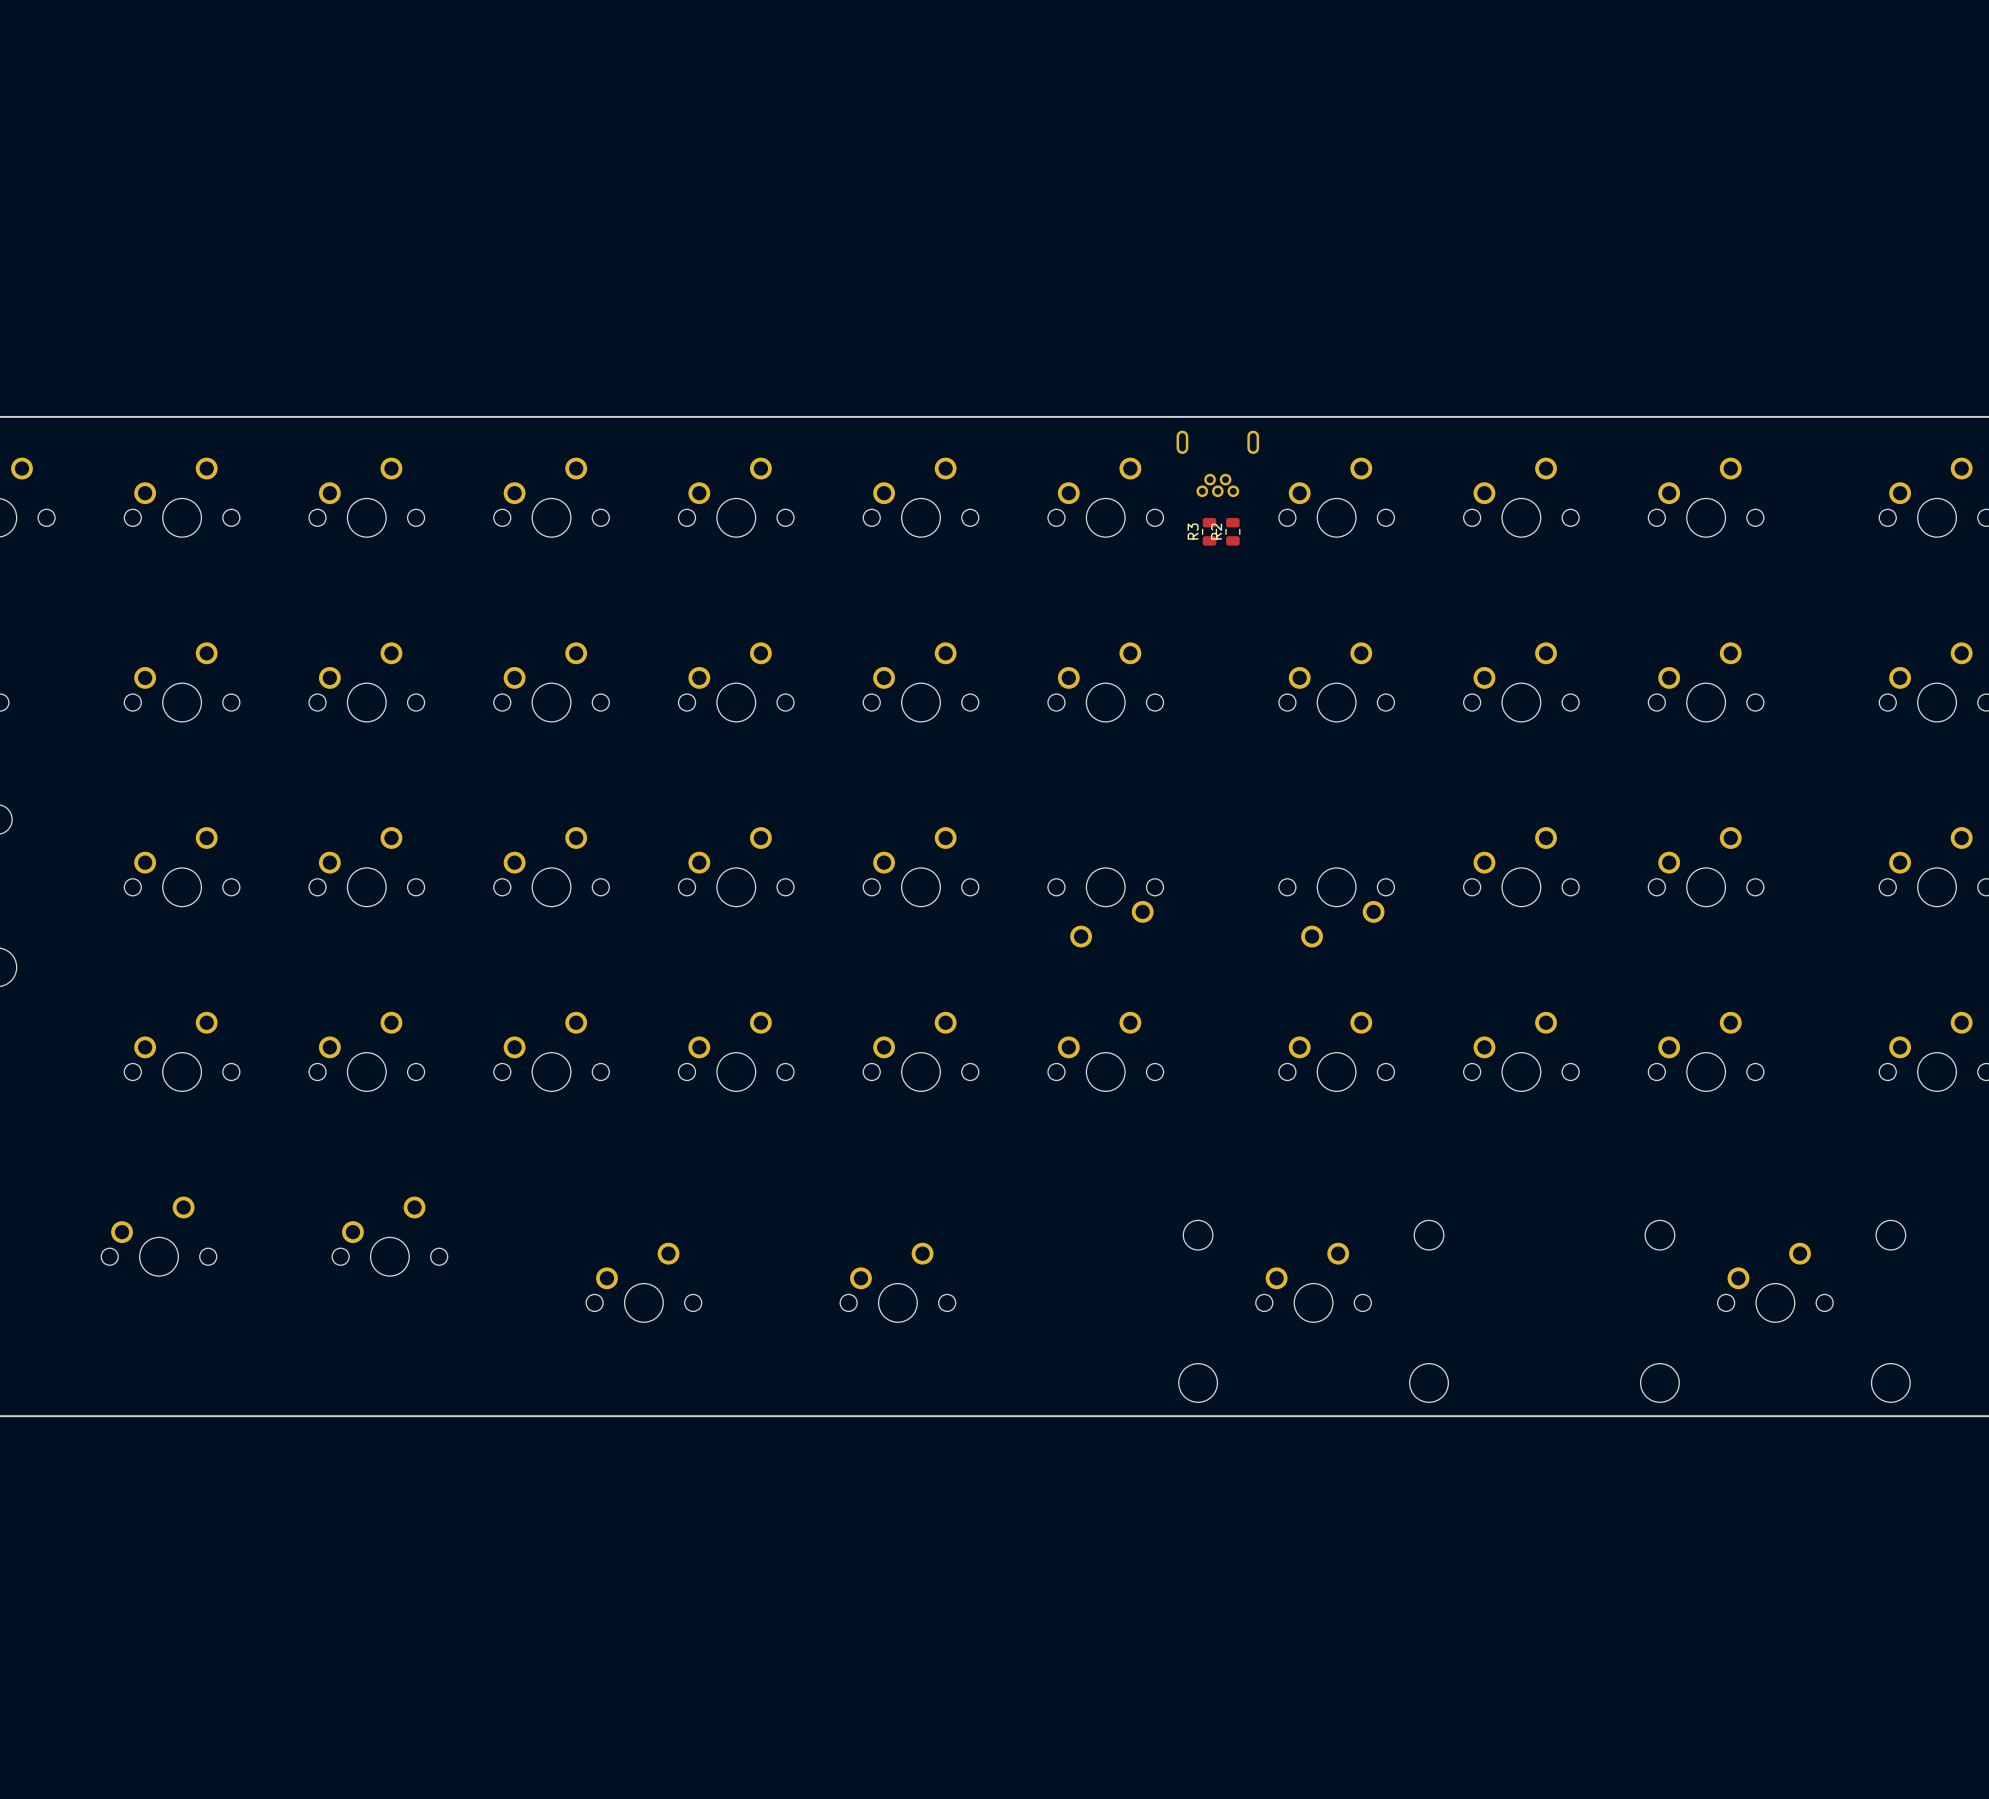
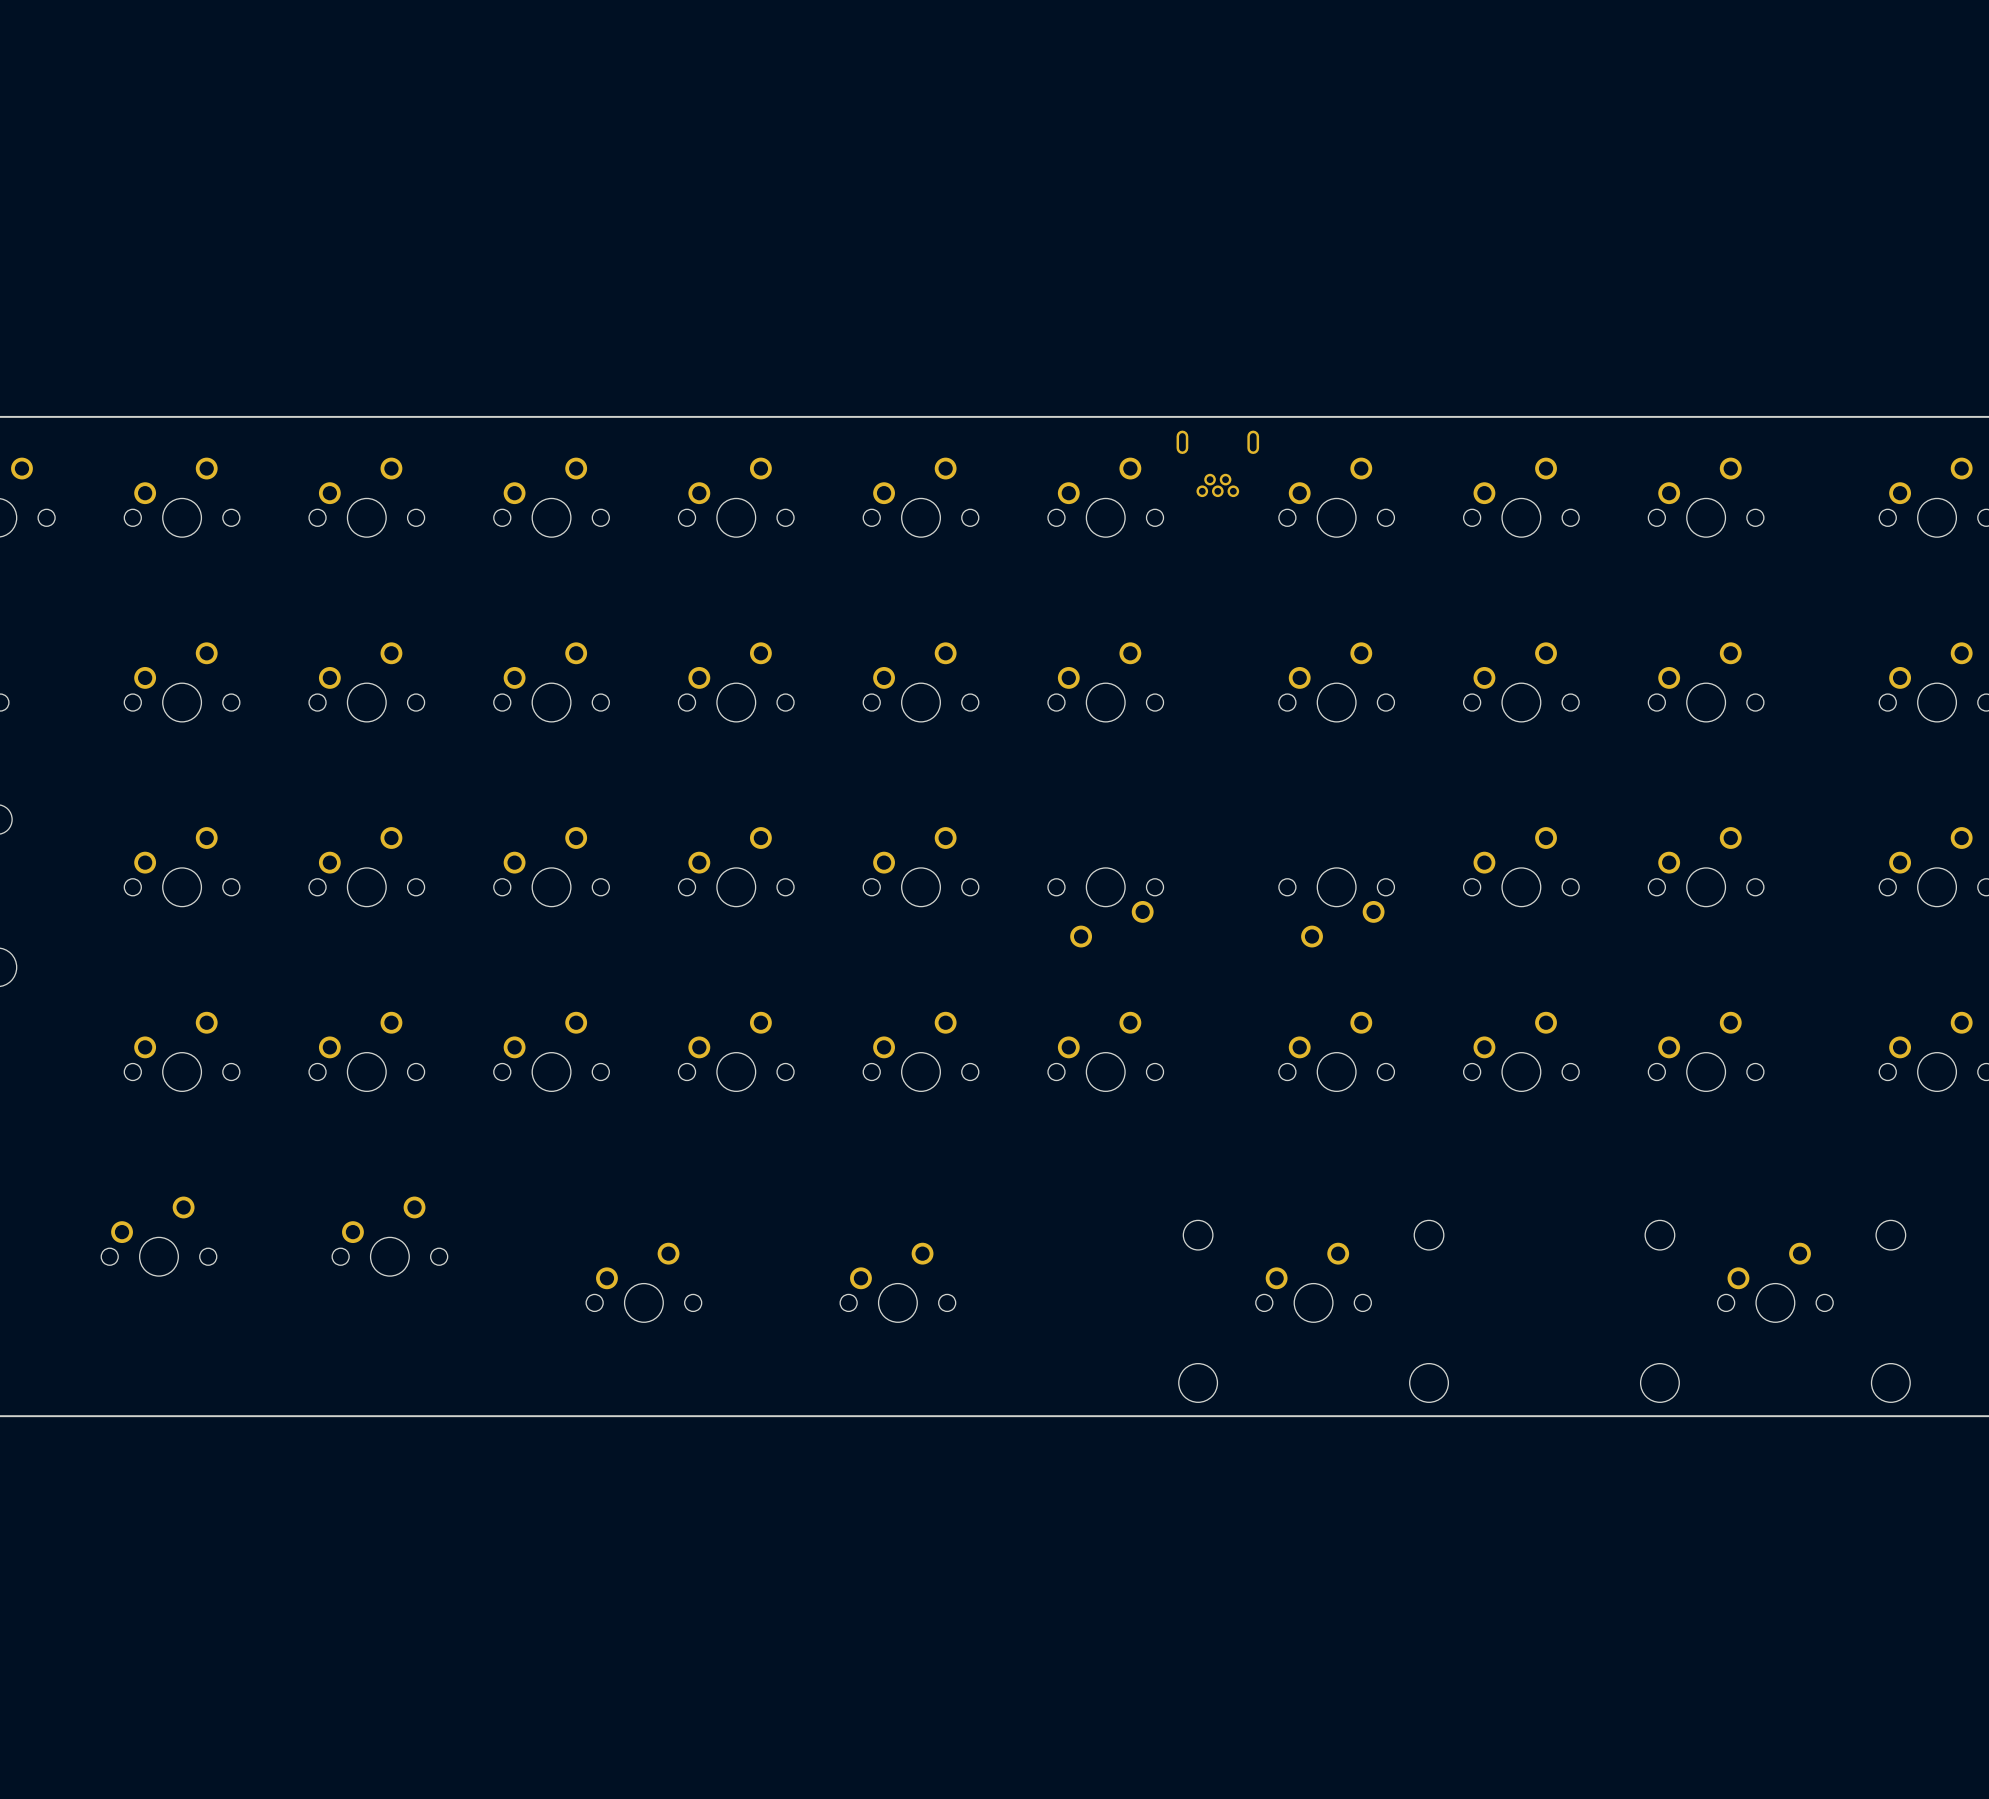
R3: (1209, 531) -> none
R2: (1232, 531) -> none

